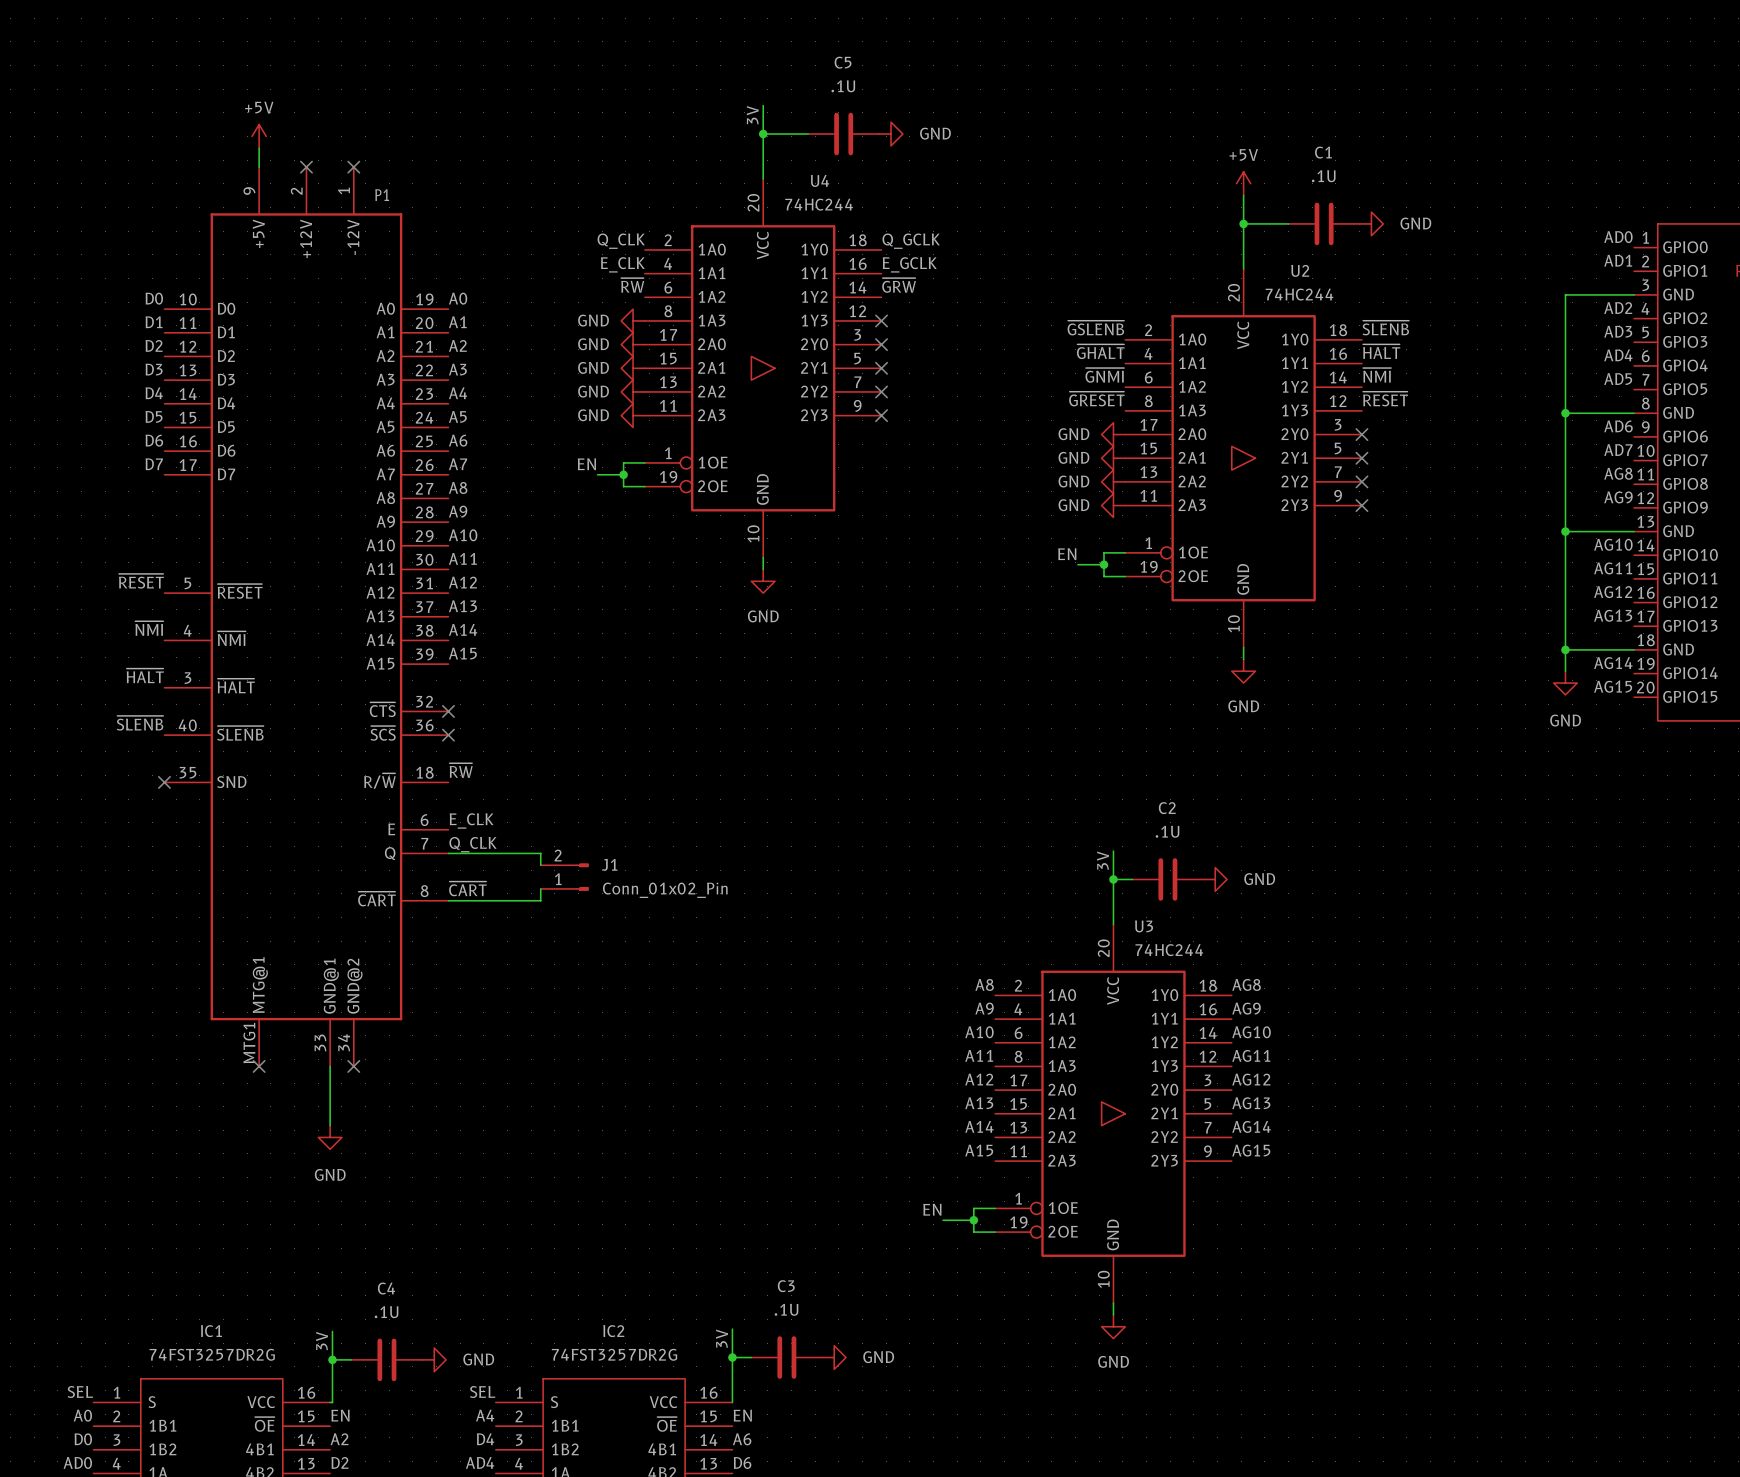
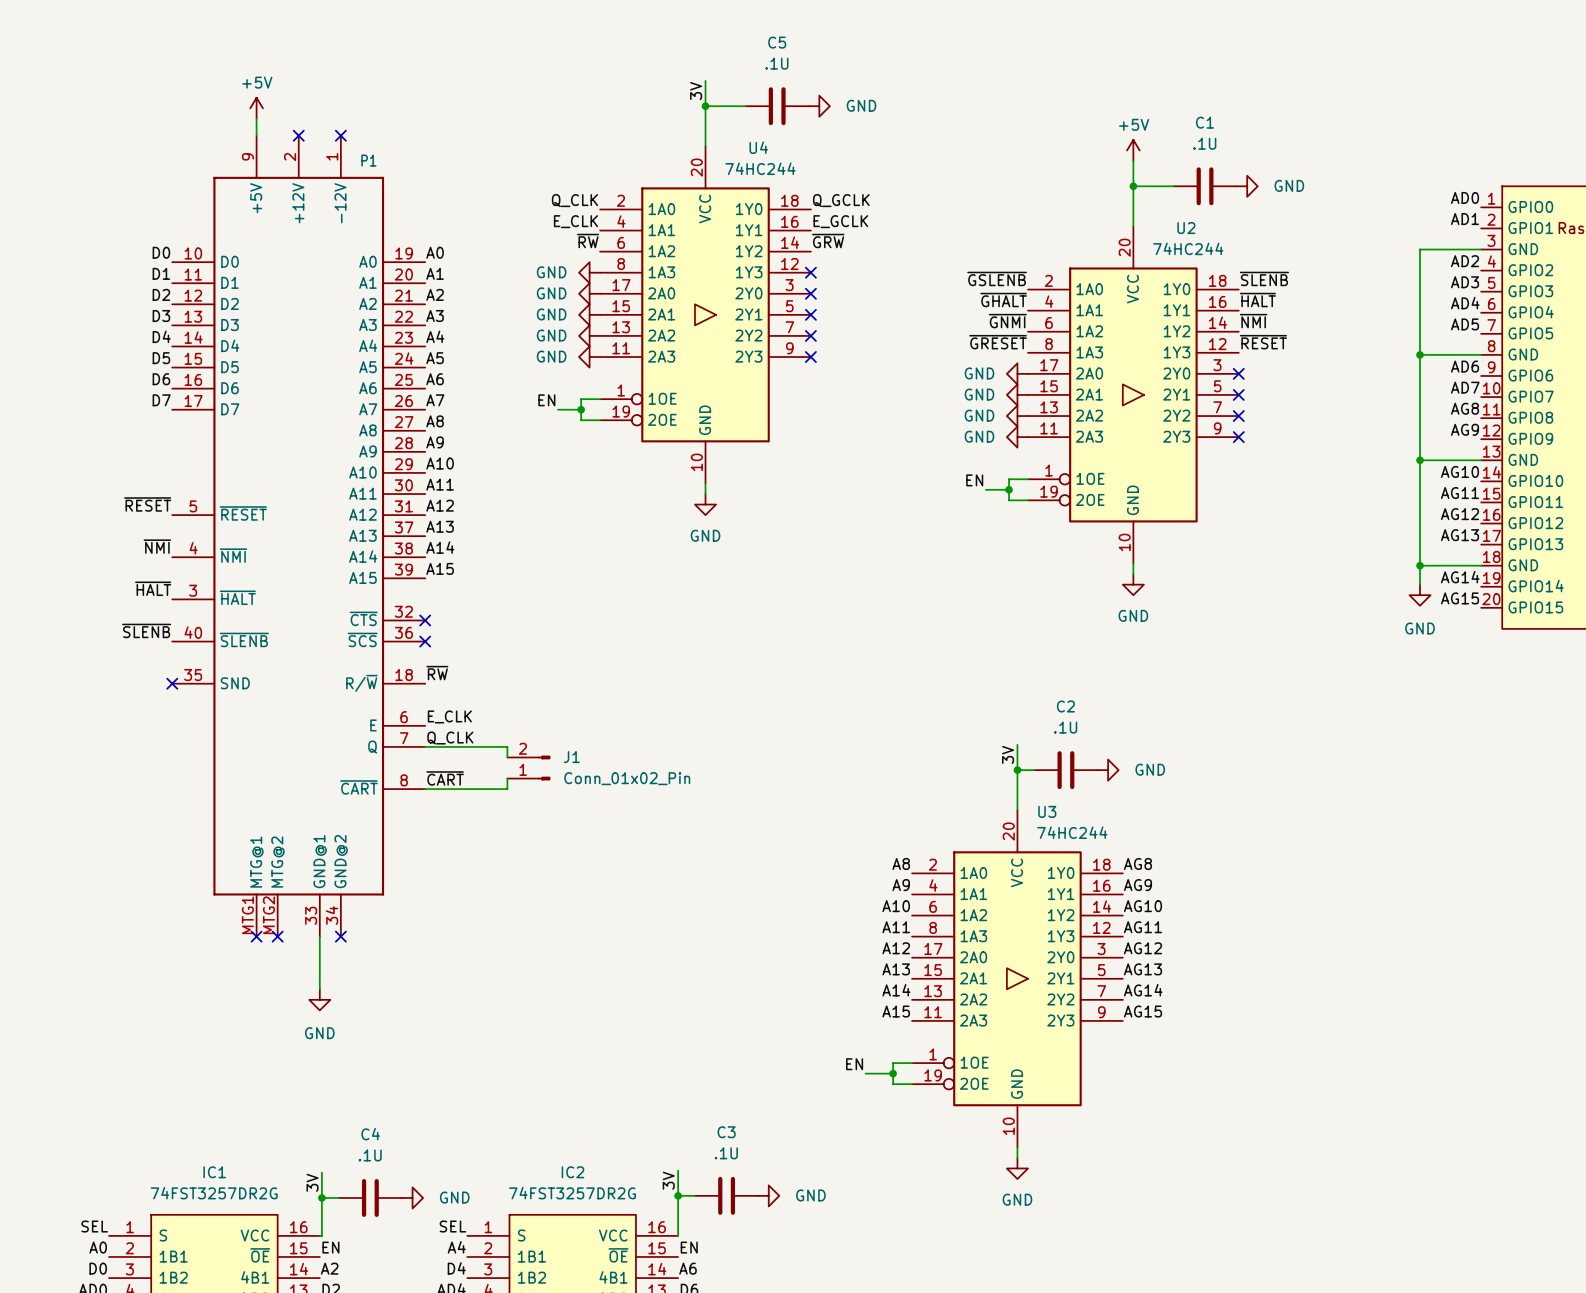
P1 symbol: [164, 167, 449, 1067] -> [172, 135, 426, 937]
no-connect mark: none -> (277, 936)

